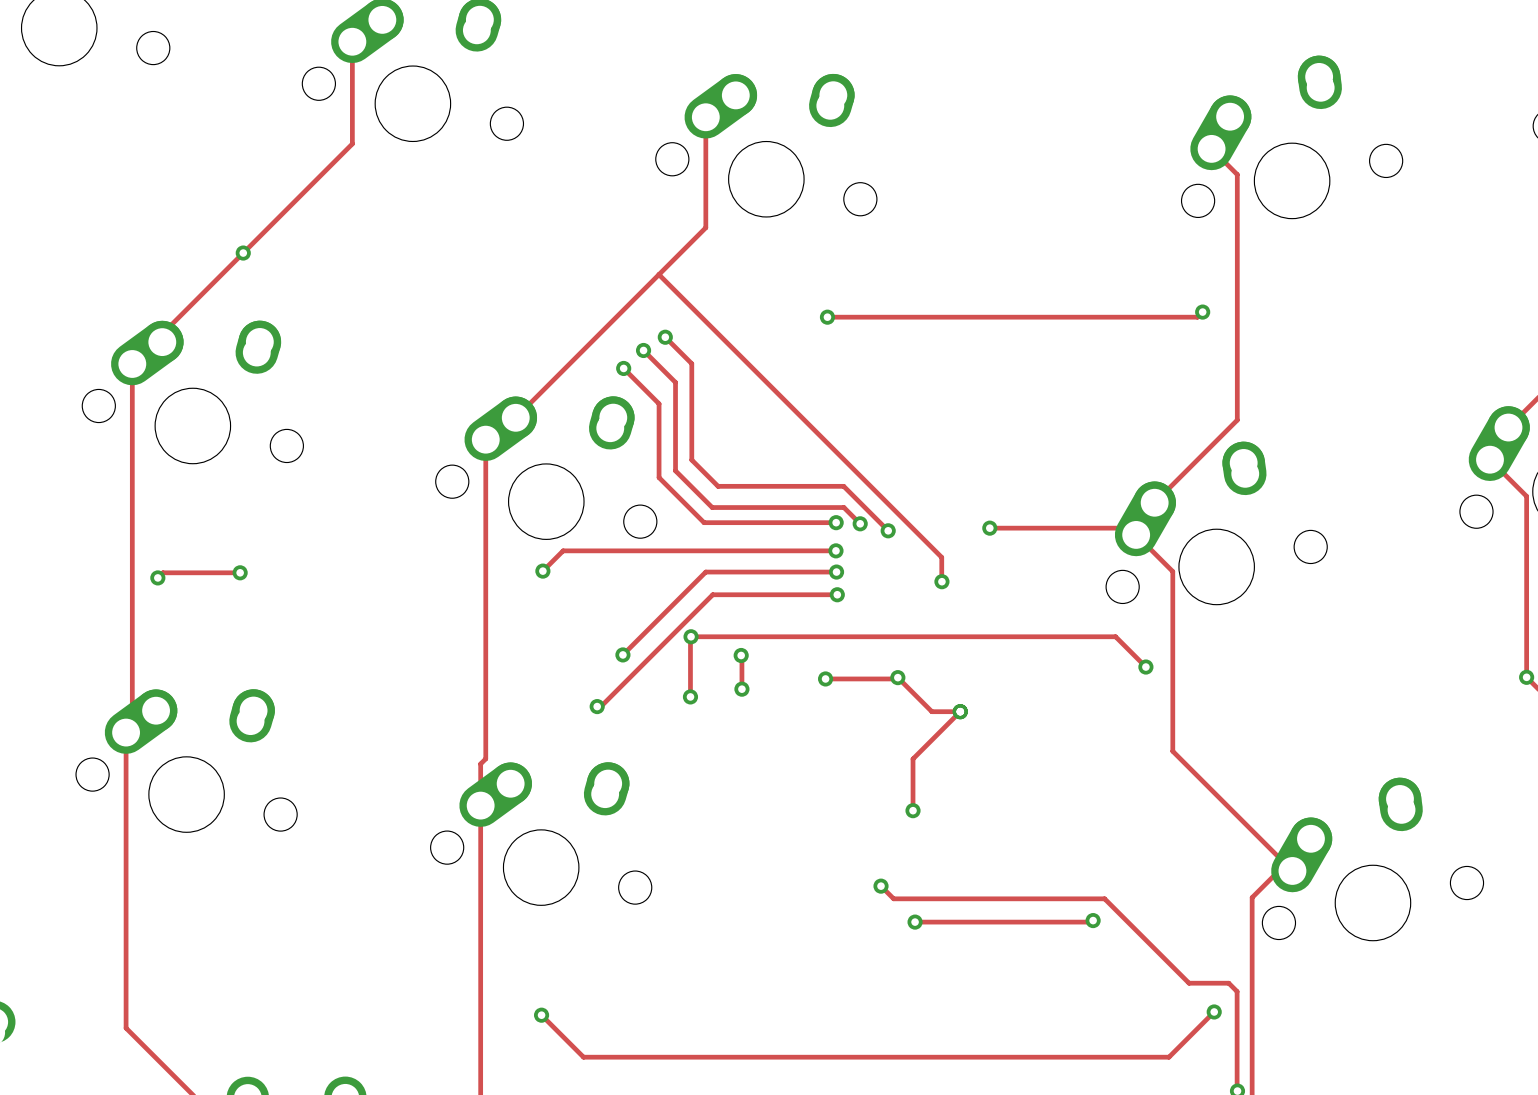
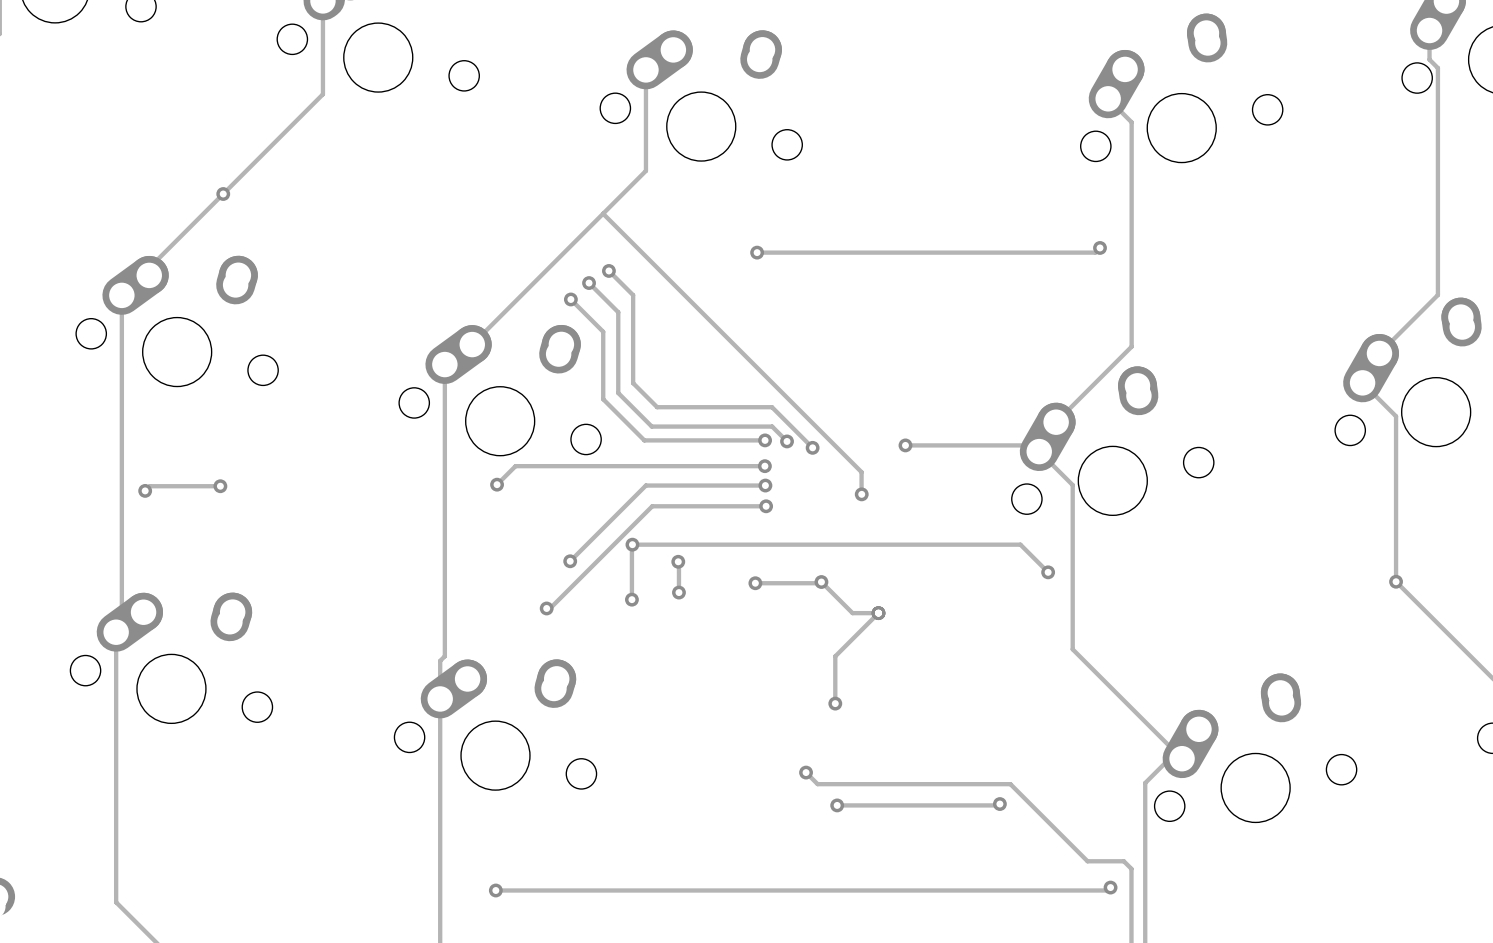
track: (541, 1015) (583, 1057) (1168, 1057) (1211, 1015) -> (495, 890) (1107, 890)

